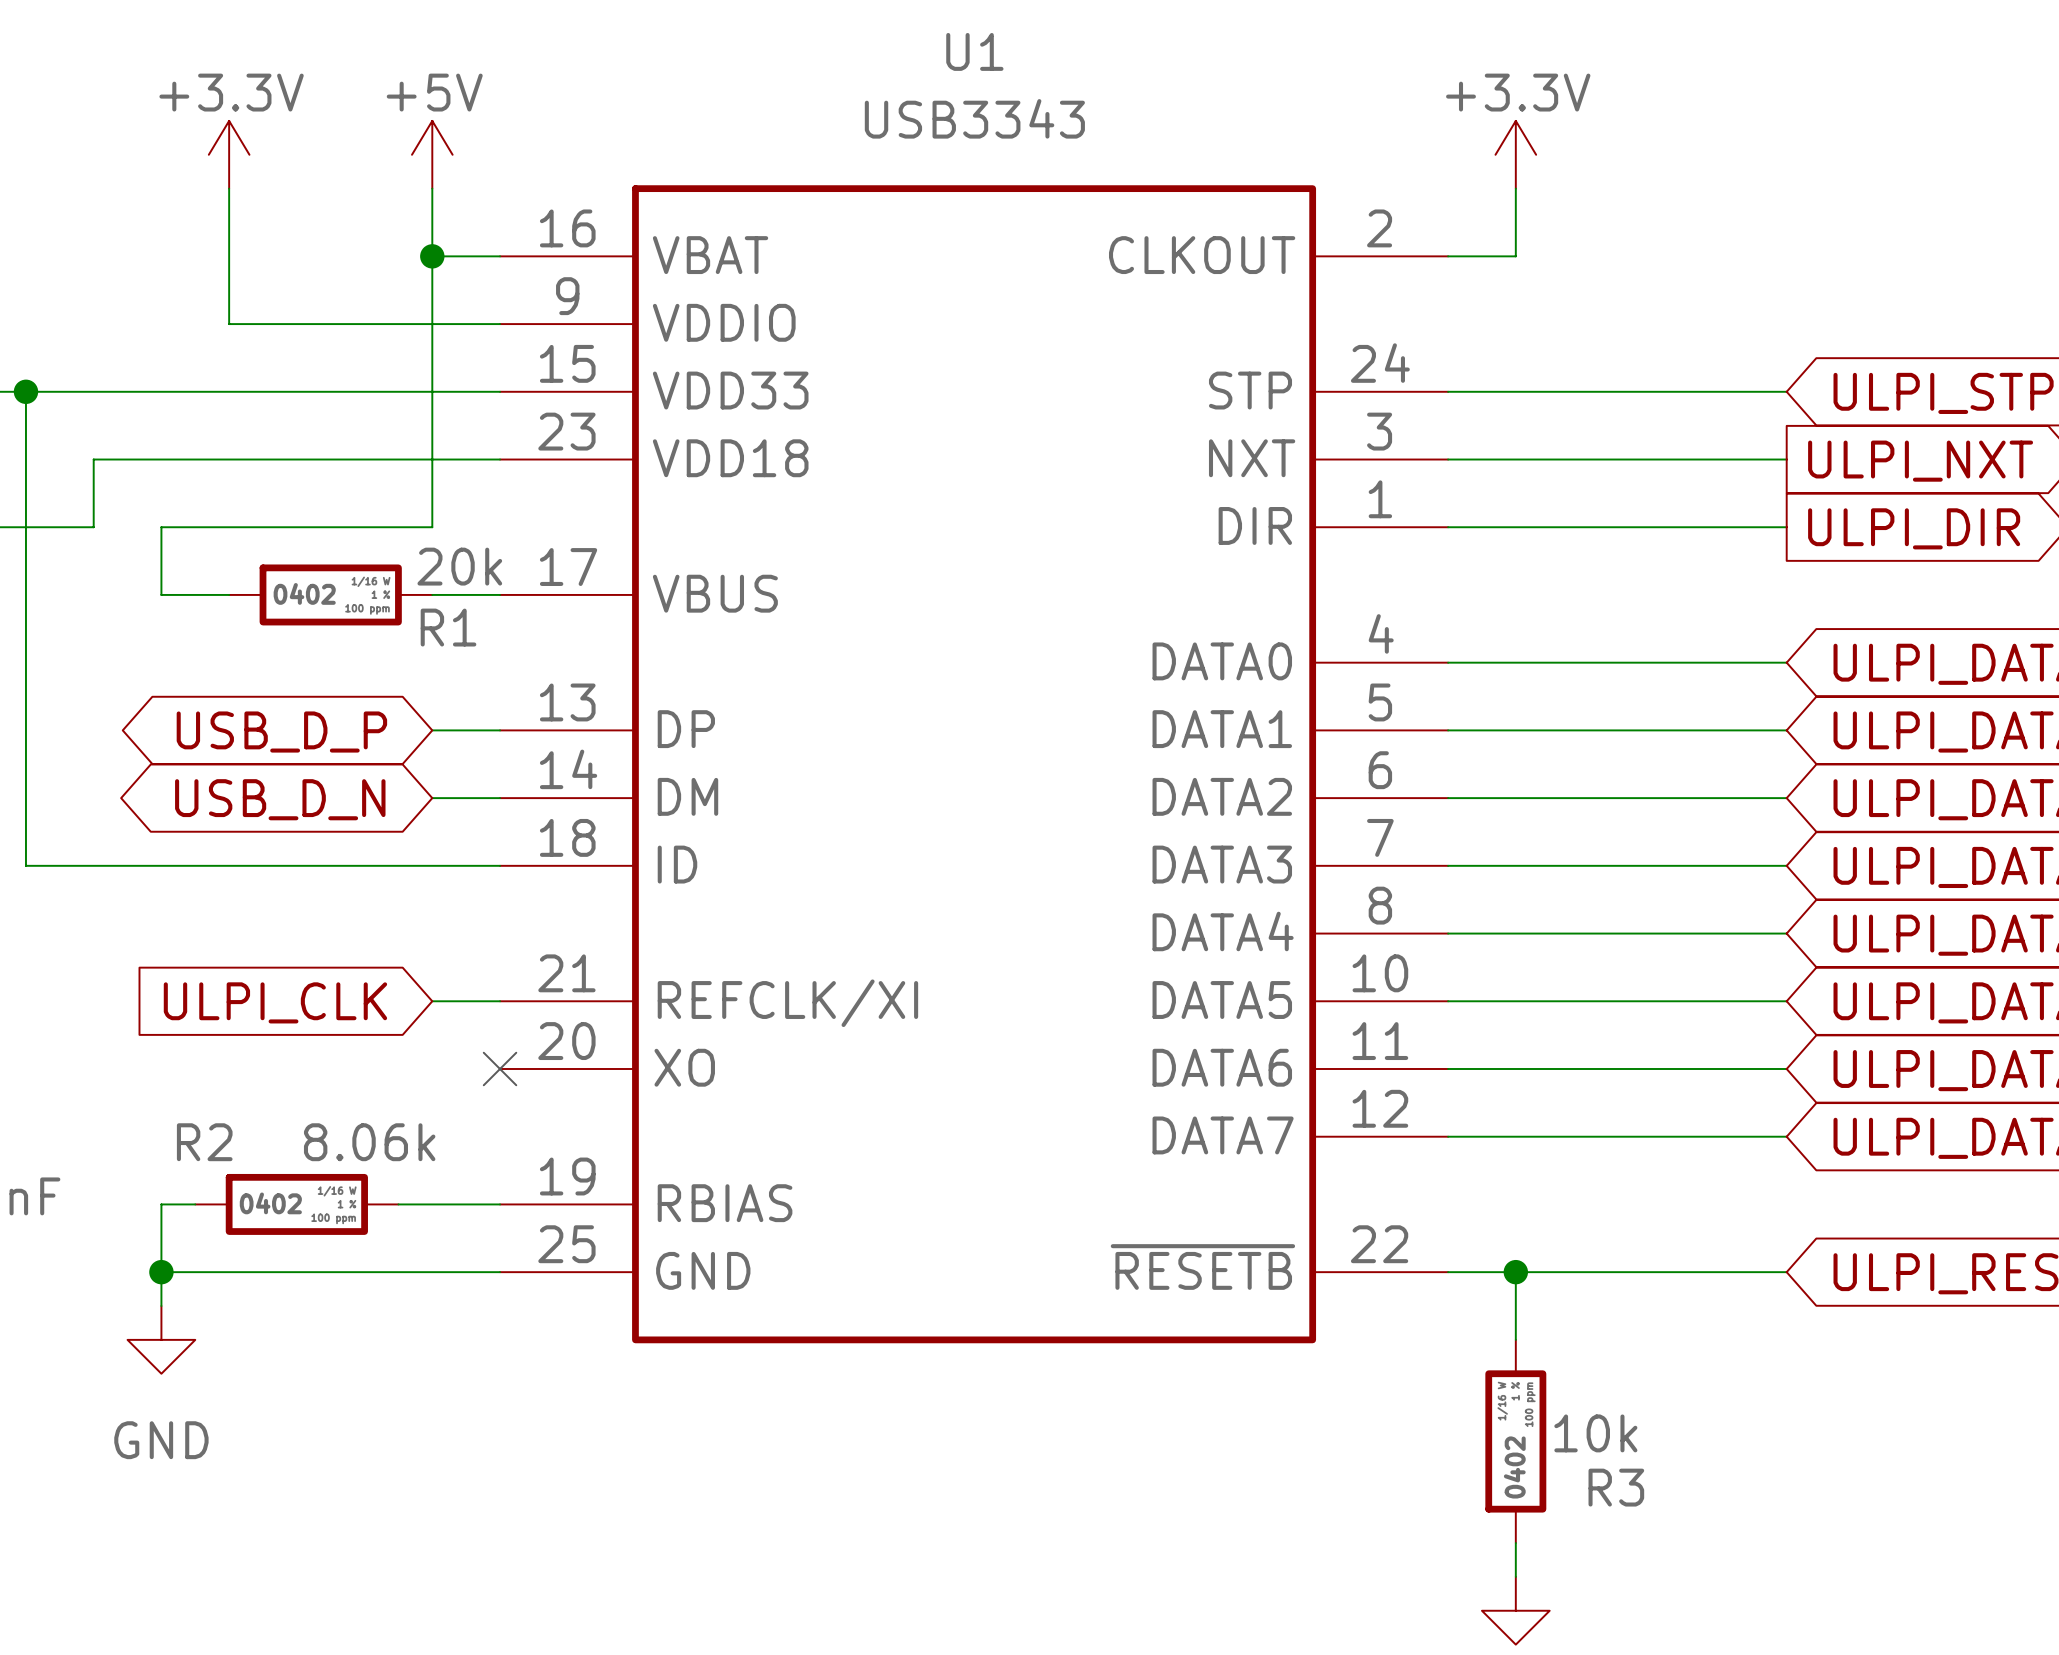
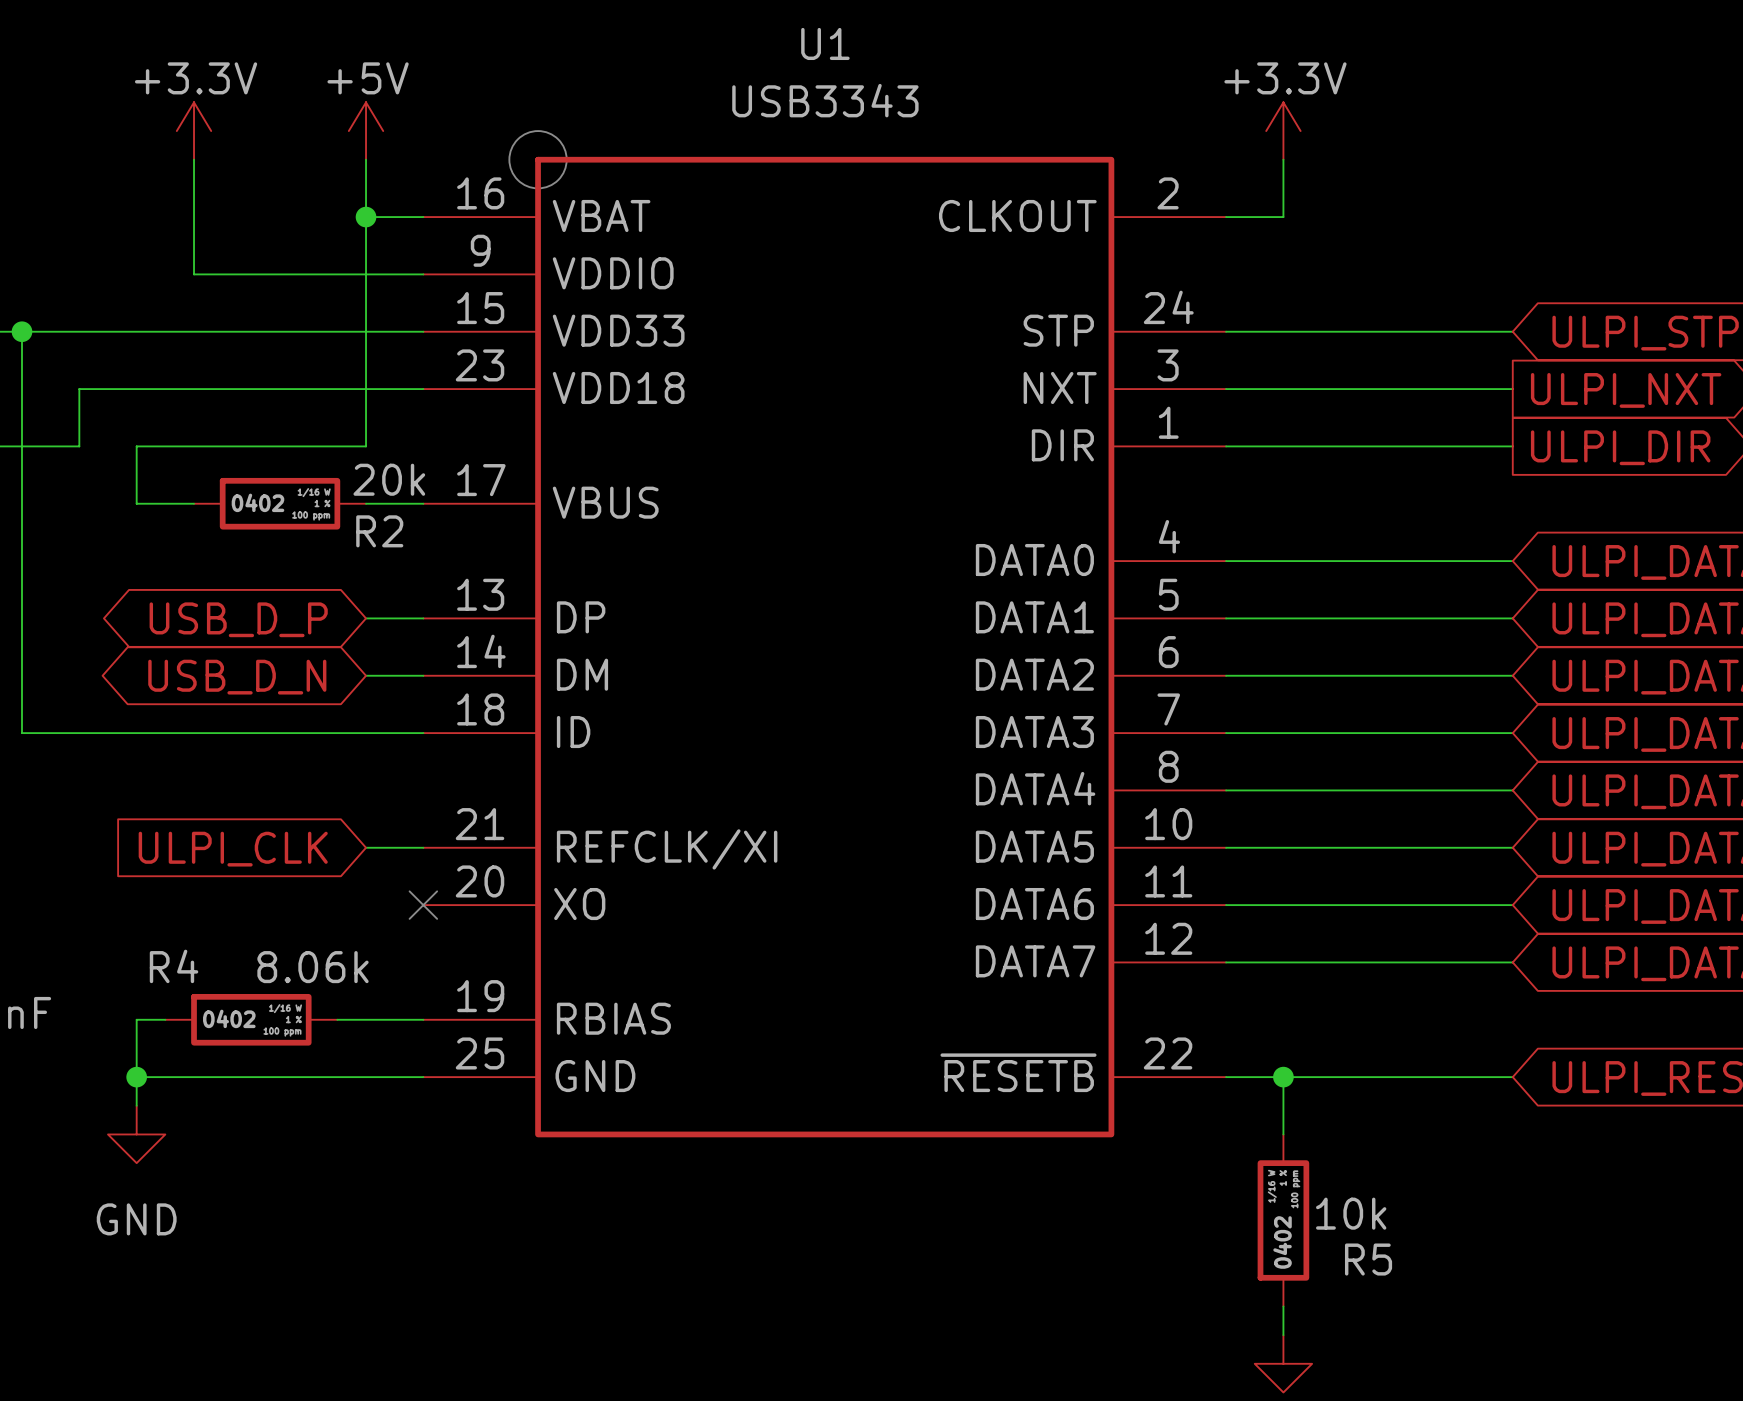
drawing: none -> [509, 131, 567, 189]
R1 name: R1 (448, 627) -> R2 (379, 531)
R2 name: R2 (204, 1142) -> R4 (174, 966)
R3 name: R3 (1616, 1487) -> R5 (1368, 1259)

